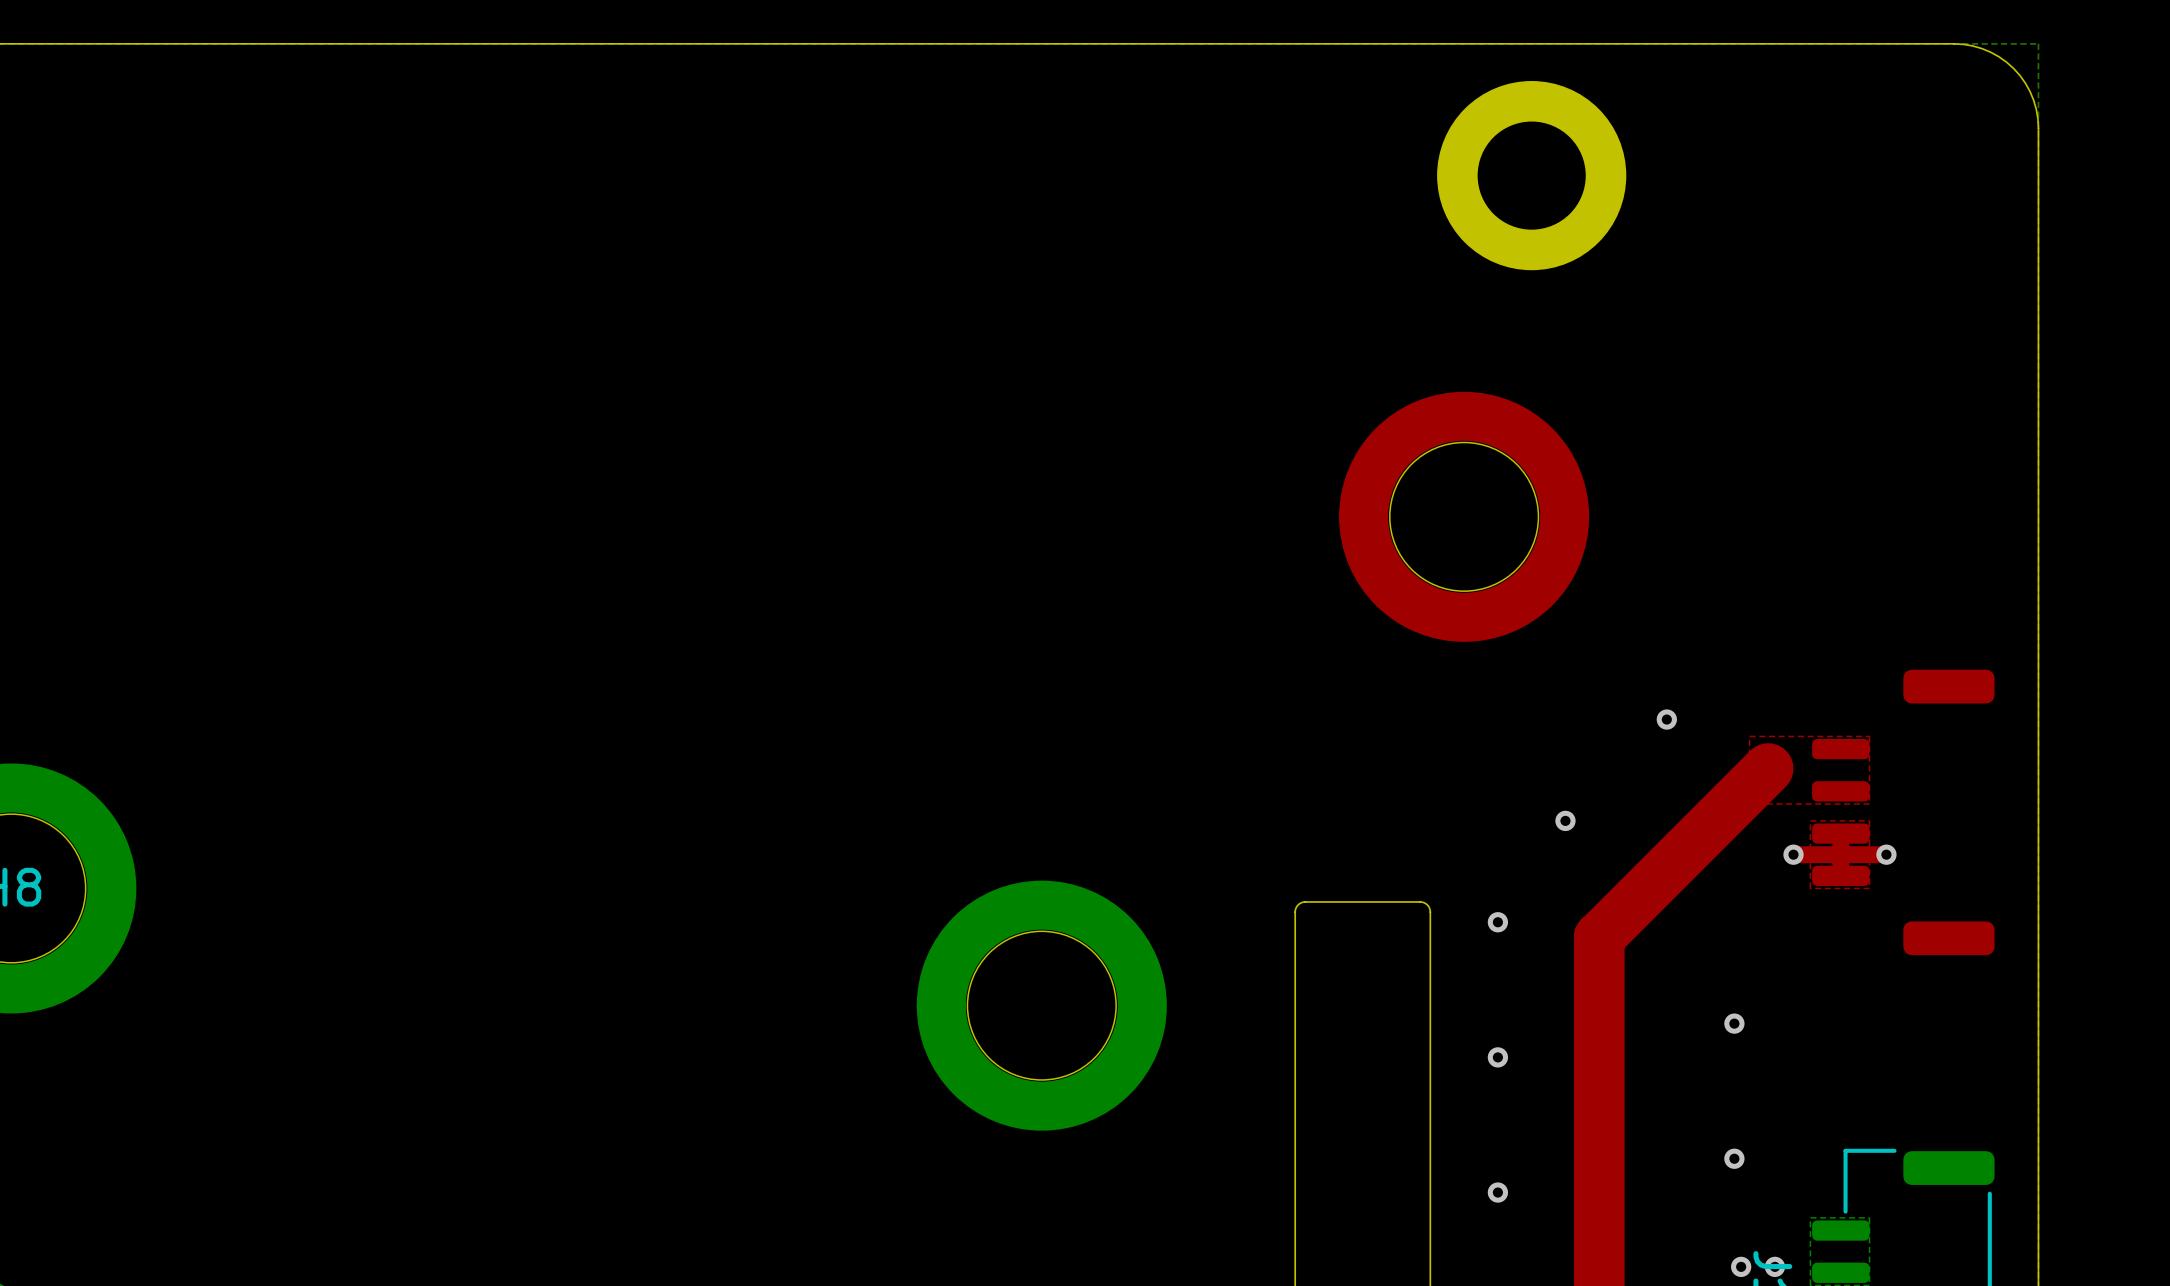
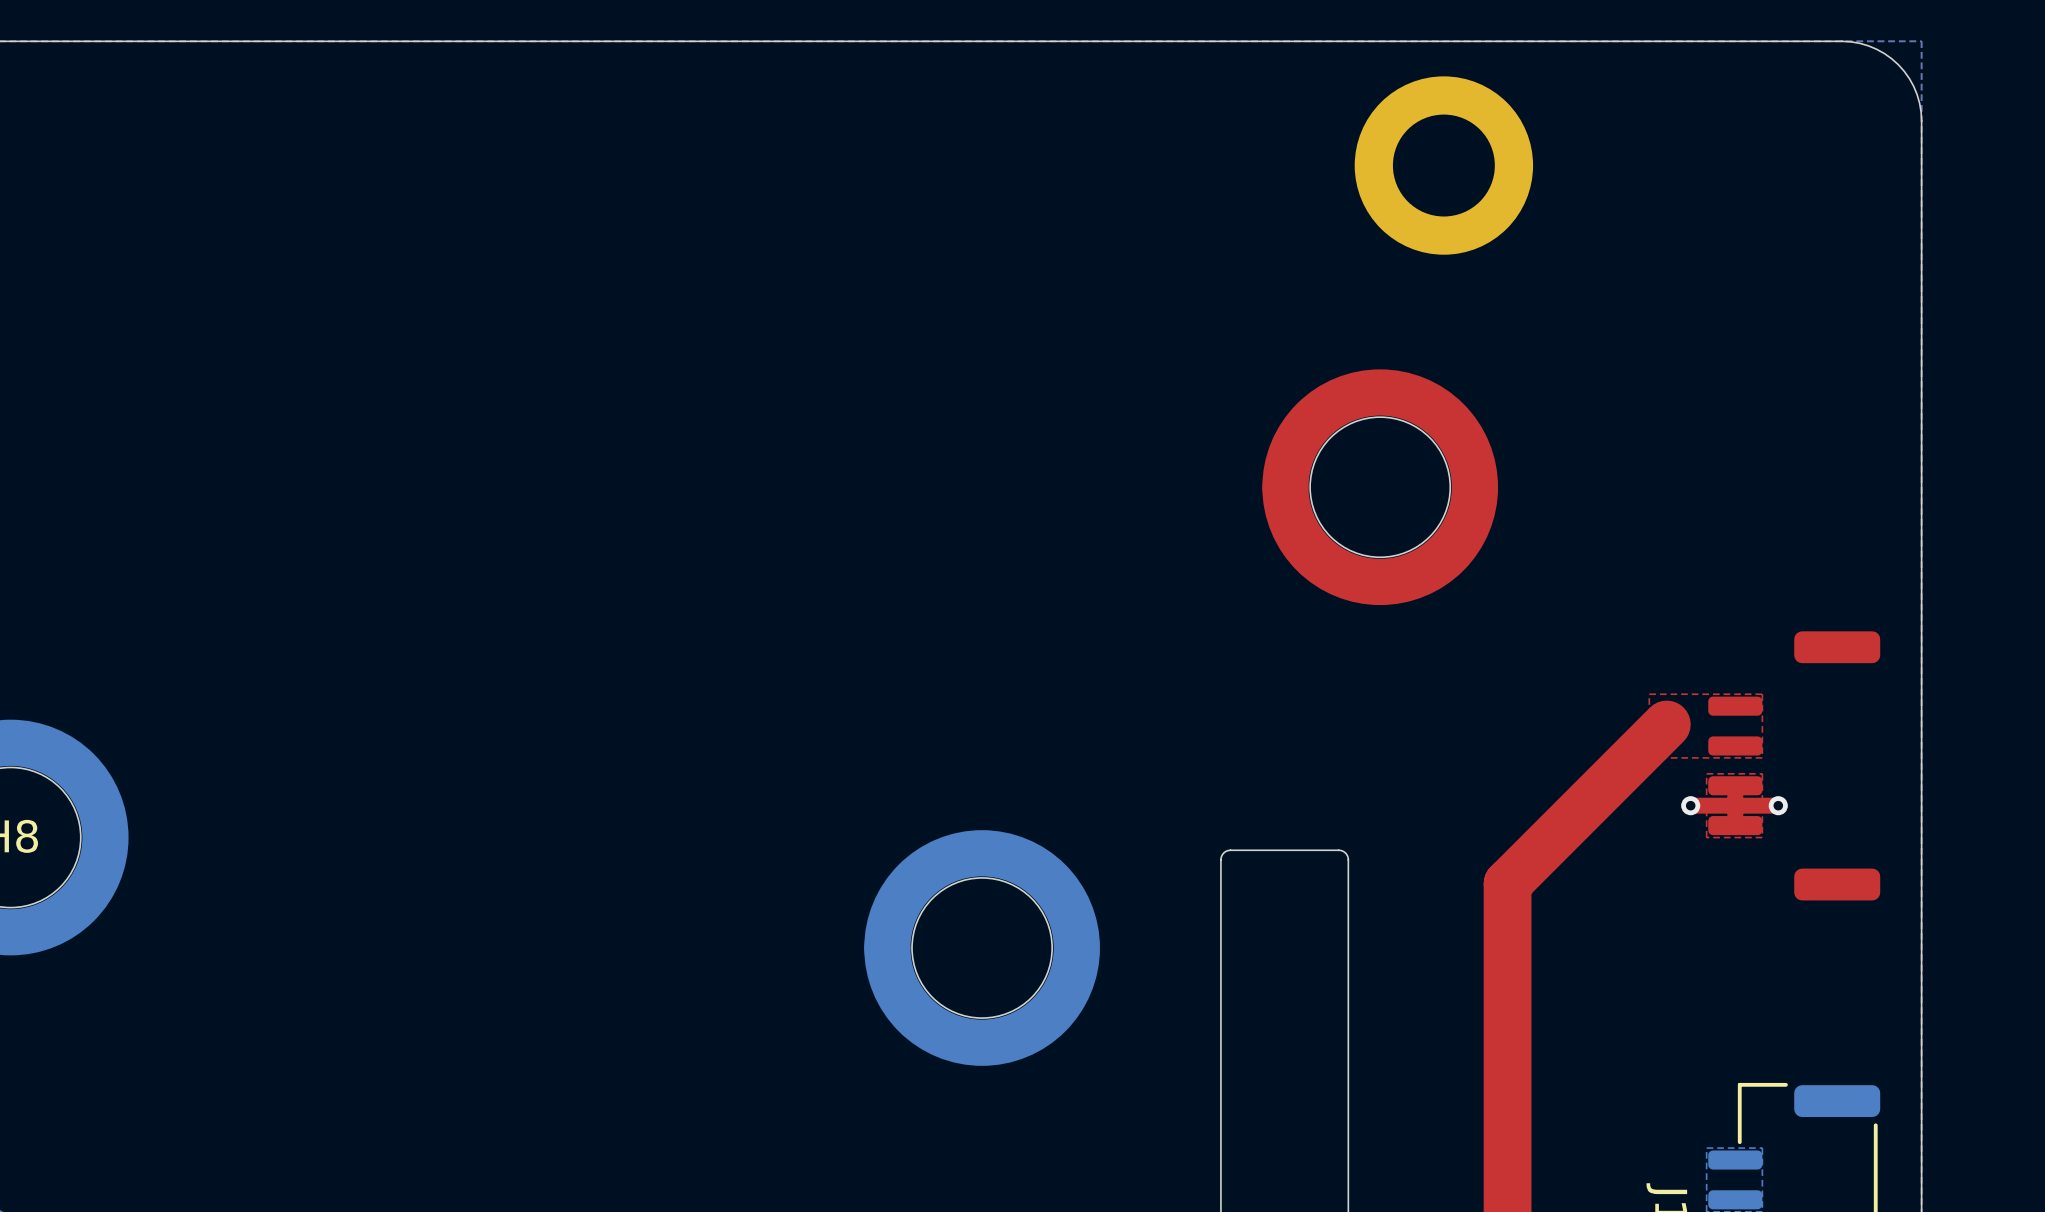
via: (1666, 719) -> none
via: (1565, 820) -> none
via: (1497, 922) -> none
via: (1734, 1023) -> none
via: (1497, 1057) -> none
via: (1734, 1158) -> none
via: (1497, 1192) -> none
via: (1741, 1266) -> none
via: (1774, 1266) -> none

